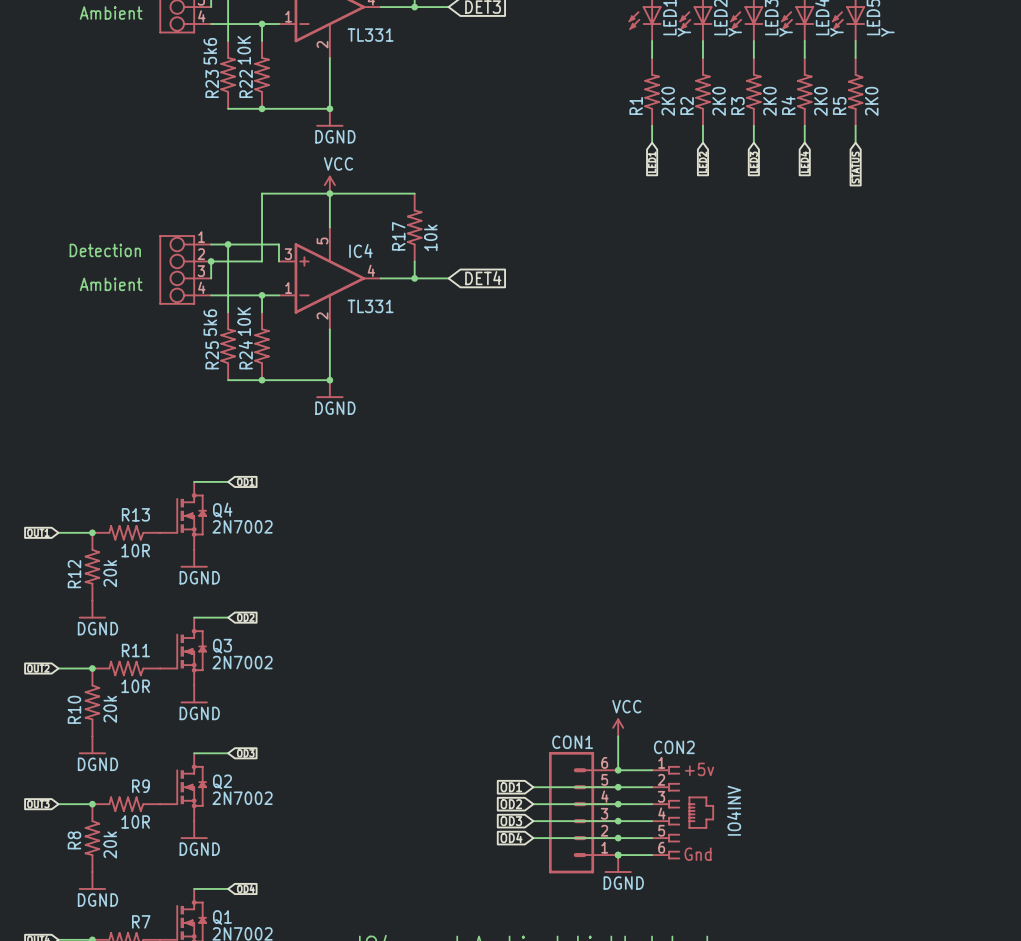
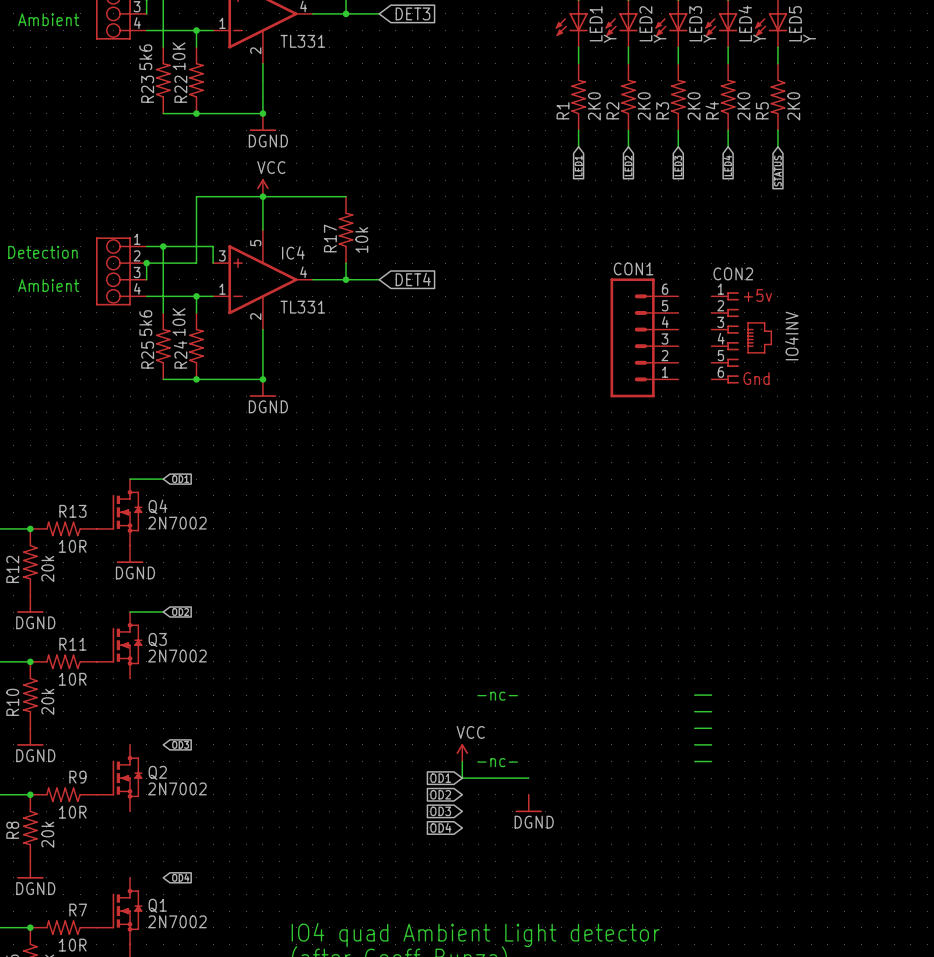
power symbol: DGND (194, 694) -> none
wire: none -> (694, 695) (711, 695)
text: none -> -nc- (497, 696)
wire: none -> (694, 711) (711, 711)
power symbol position: VCC (618, 727) -> VCC (462, 752)
wire: (618, 736) (618, 770) (652, 770) -> none
wire: none -> (694, 728) (711, 728)
wire: (194, 753) (228, 753) -> none
wire: none -> (694, 744) (711, 744)
wire: none -> (462, 761) (462, 778)
junction: (618, 770) -> none
wire: none -> (694, 761) (711, 761)
text: none -> -nc- (497, 762)
wire: (601, 787) (652, 787) -> none
junction: (618, 787) -> none
wire: (533, 804) (652, 804) -> none
junction: (618, 804) -> none
CON1 position: (583, 812) -> (644, 337)
CON2 position: (682, 812) -> (741, 337)
wire: (533, 821) (652, 821) -> none
junction: (618, 821) -> none
power symbol: DGND (194, 830) -> none
wire: (533, 838) (652, 838) -> none
junction: (618, 838) -> none
wire: (618, 855) (652, 855) -> none
junction: (618, 855) -> none
power symbol position: DGND (618, 863) -> DGND (528, 803)
wire: (194, 888) (228, 888) -> none

